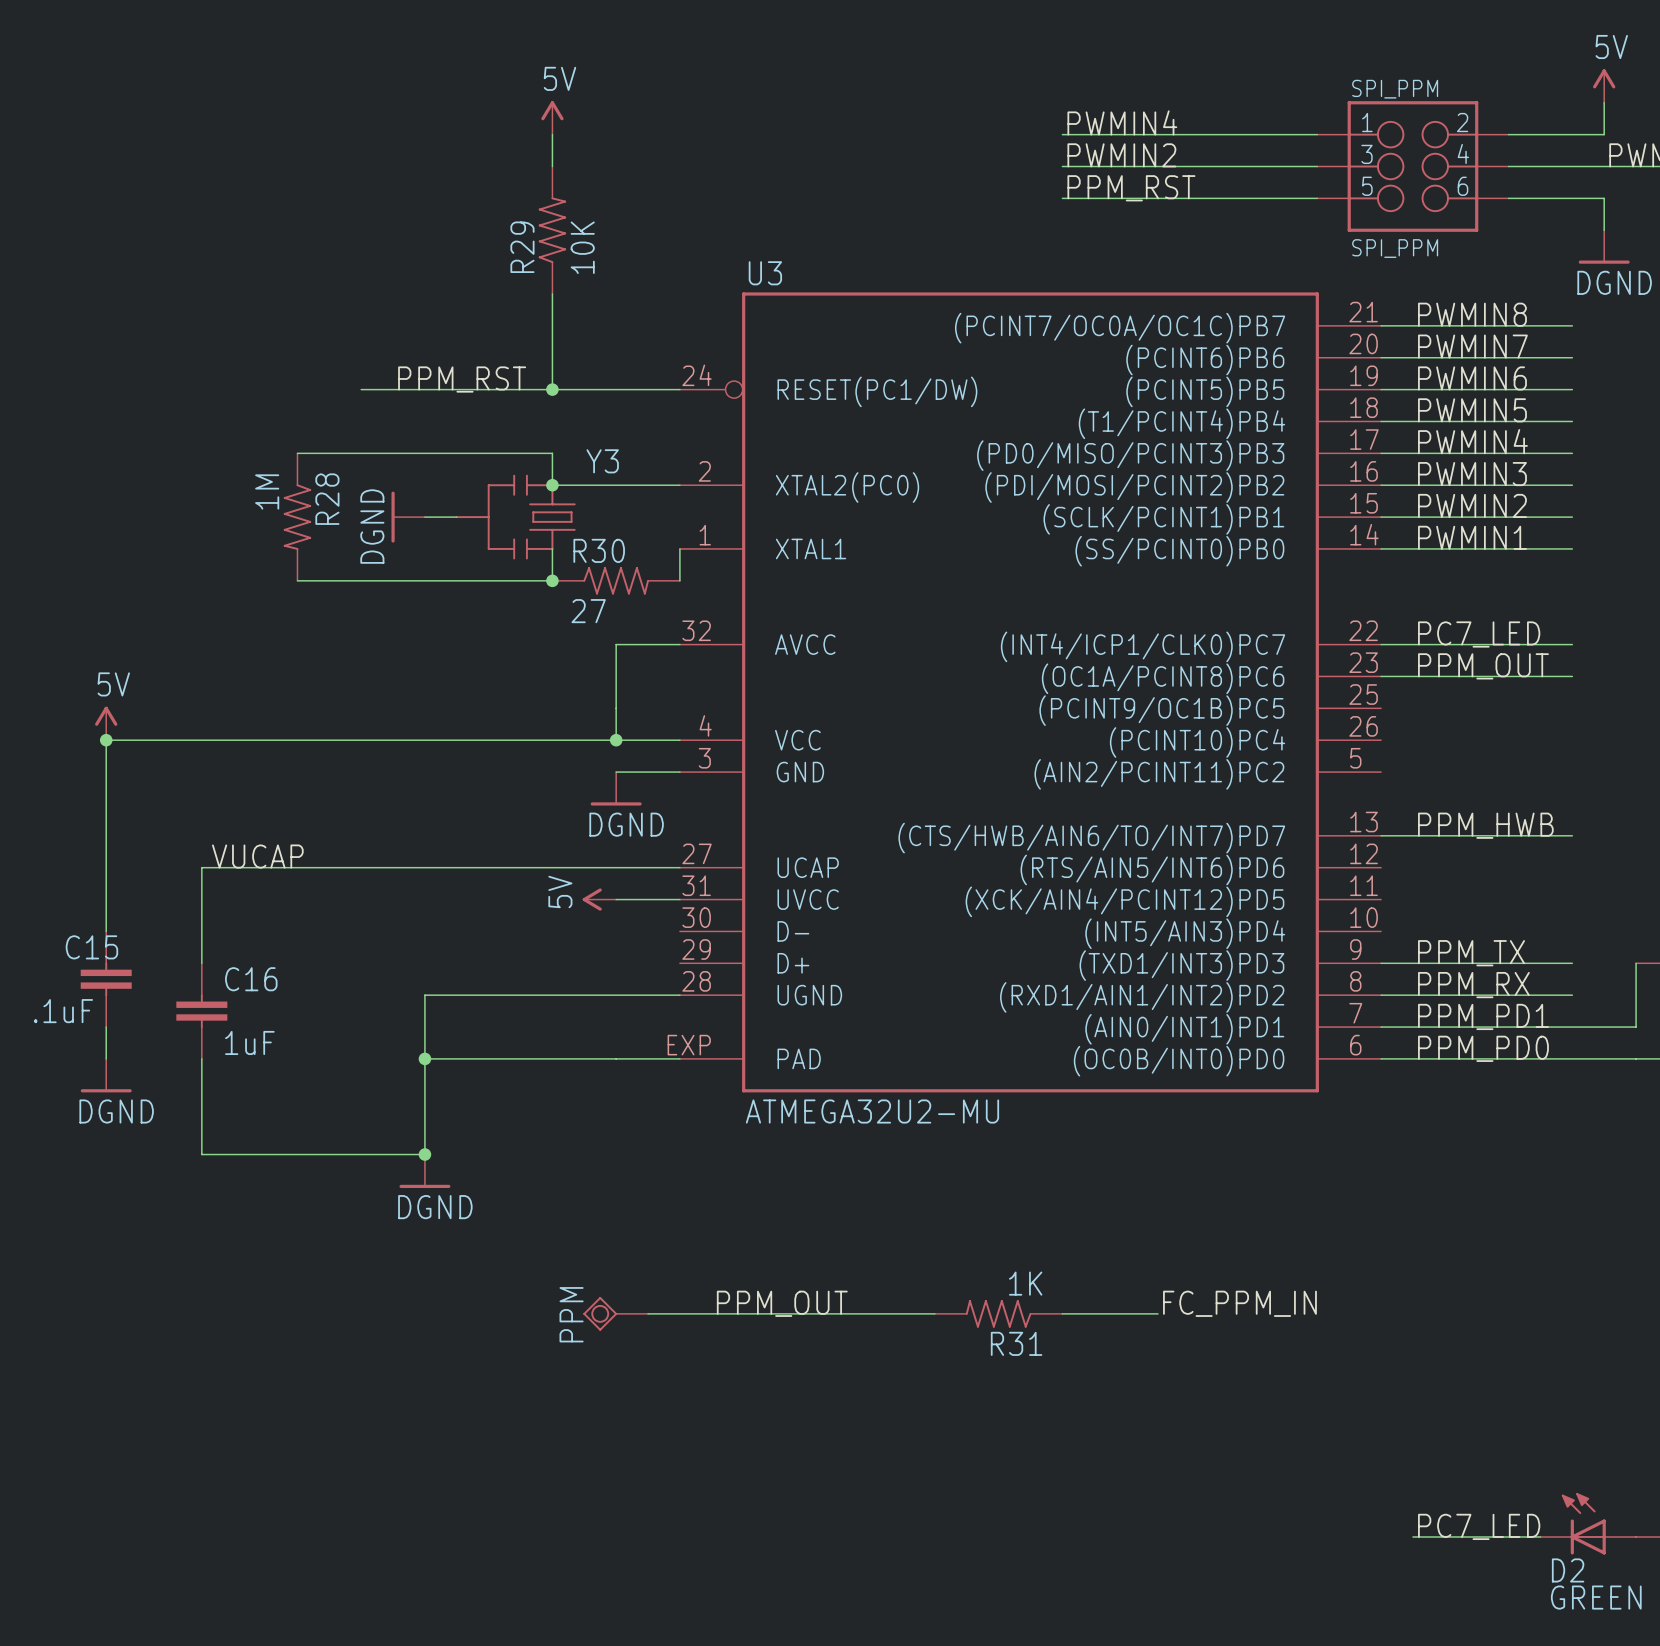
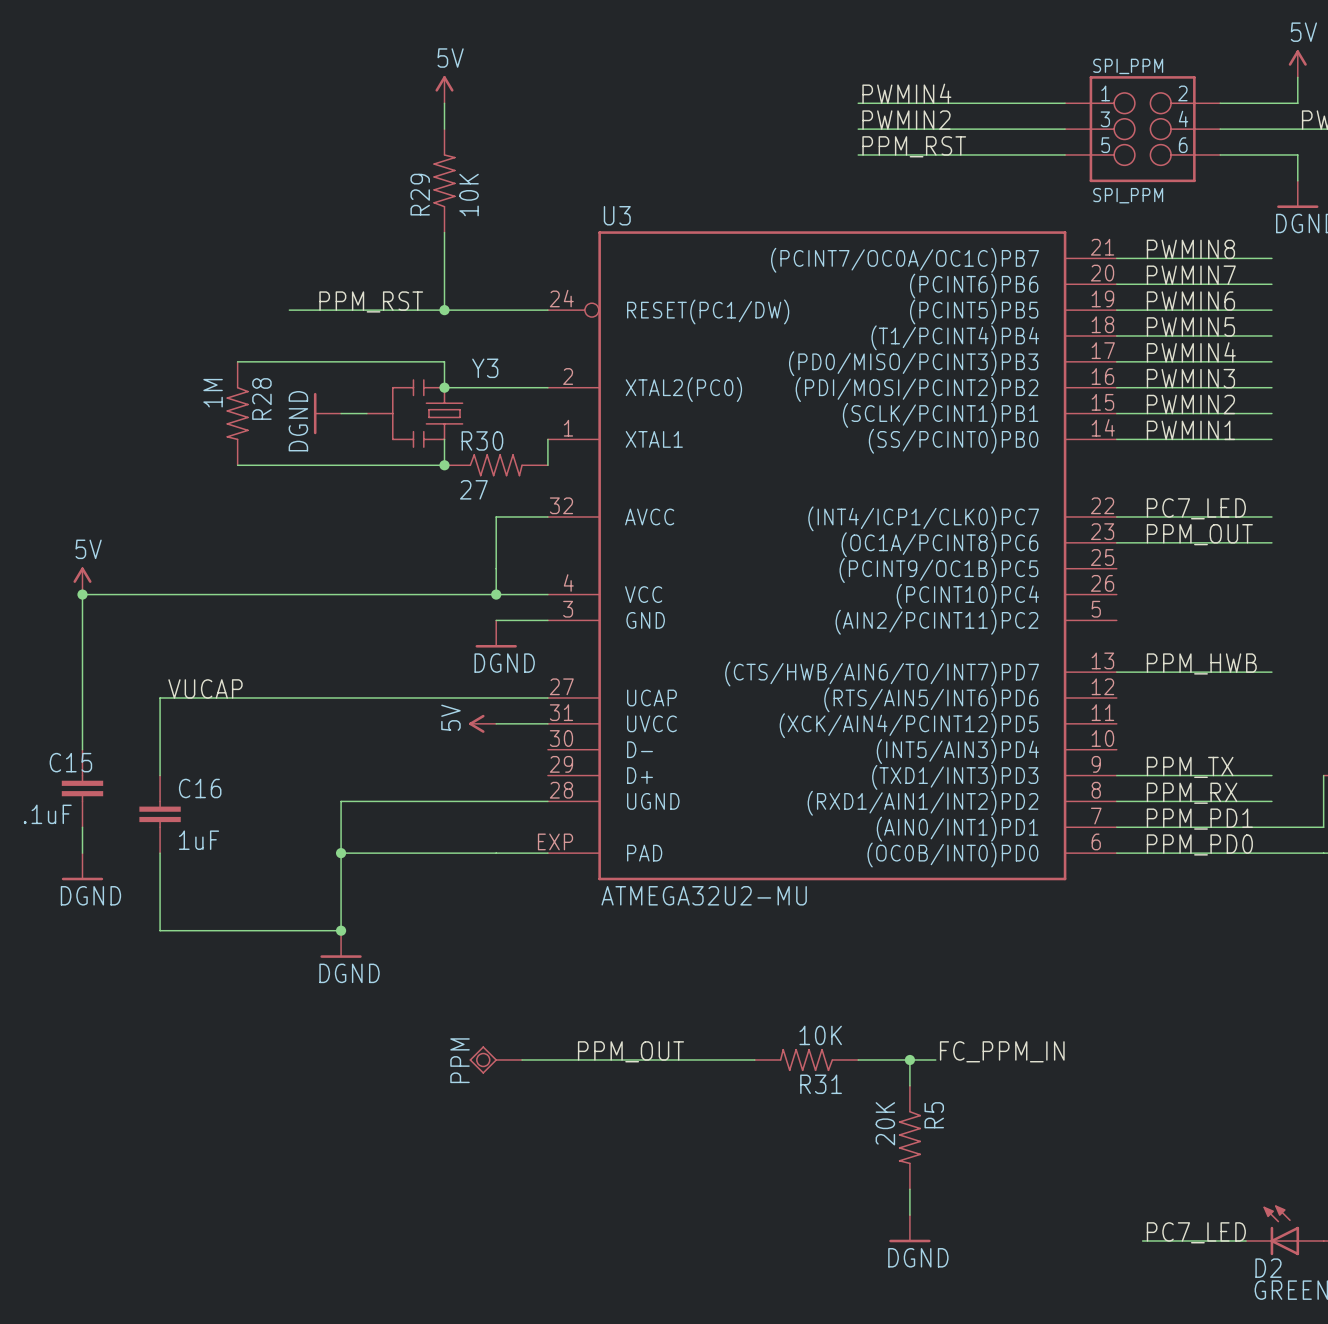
R31 value: 1K (1025, 1283) -> 10K (820, 1035)
wire: none -> (909, 1059) (909, 1085)
junction: none -> (909, 1059)
R5: none -> 20K (909, 1137)
wire: none -> (909, 1189) (909, 1215)
power symbol: none -> DGND (909, 1228)

